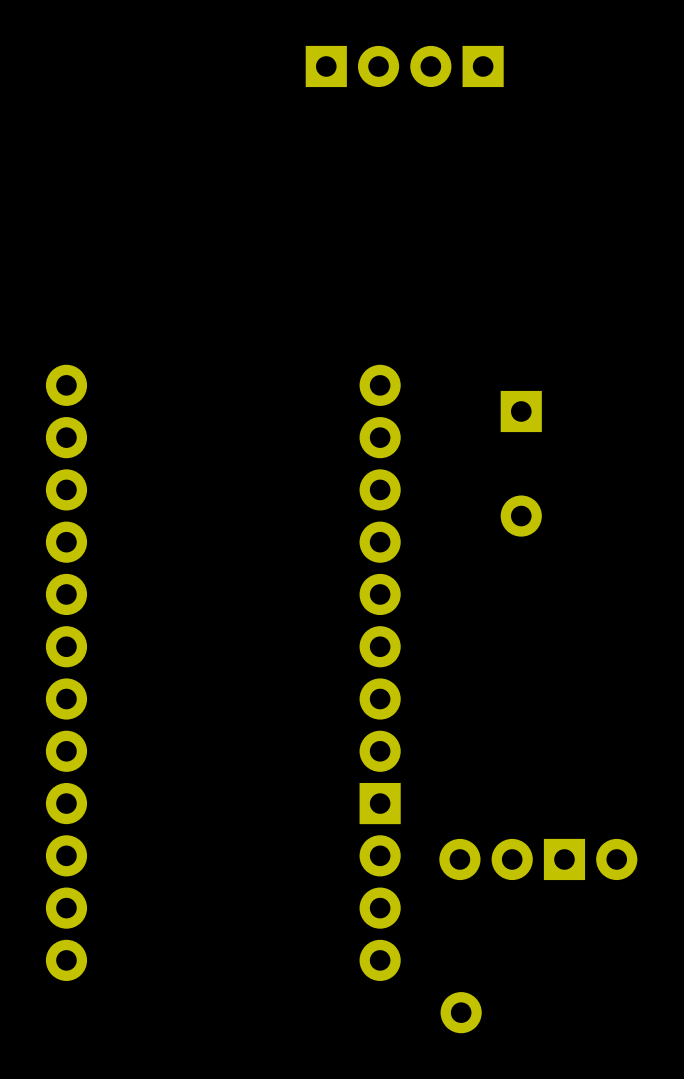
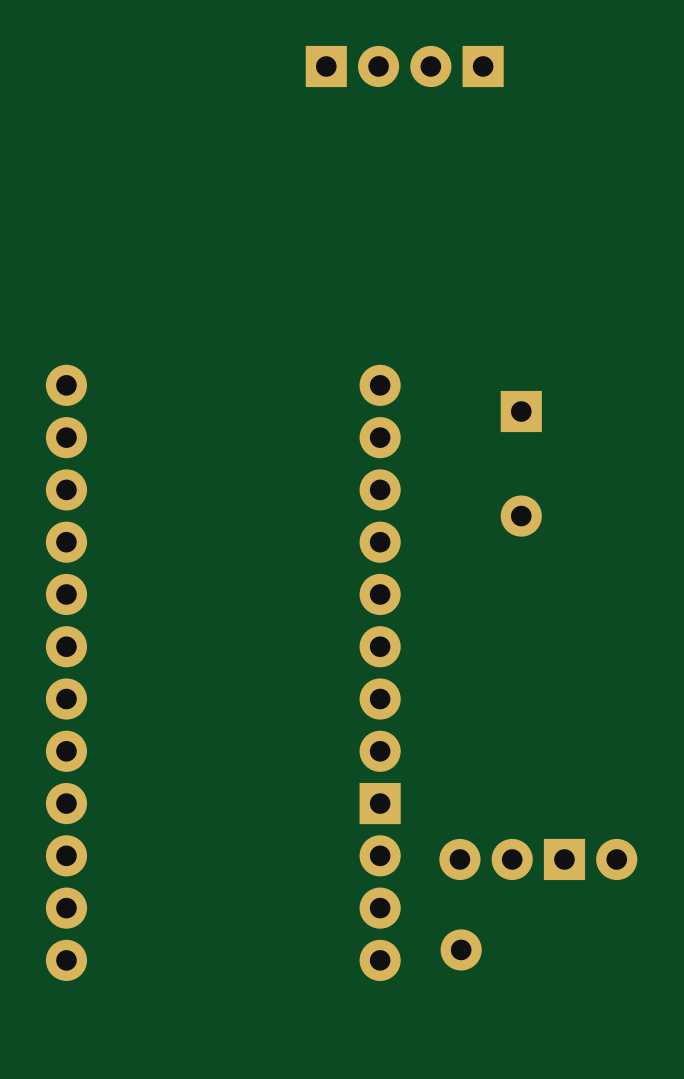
part position: (461, 1012) -> (461, 949)

